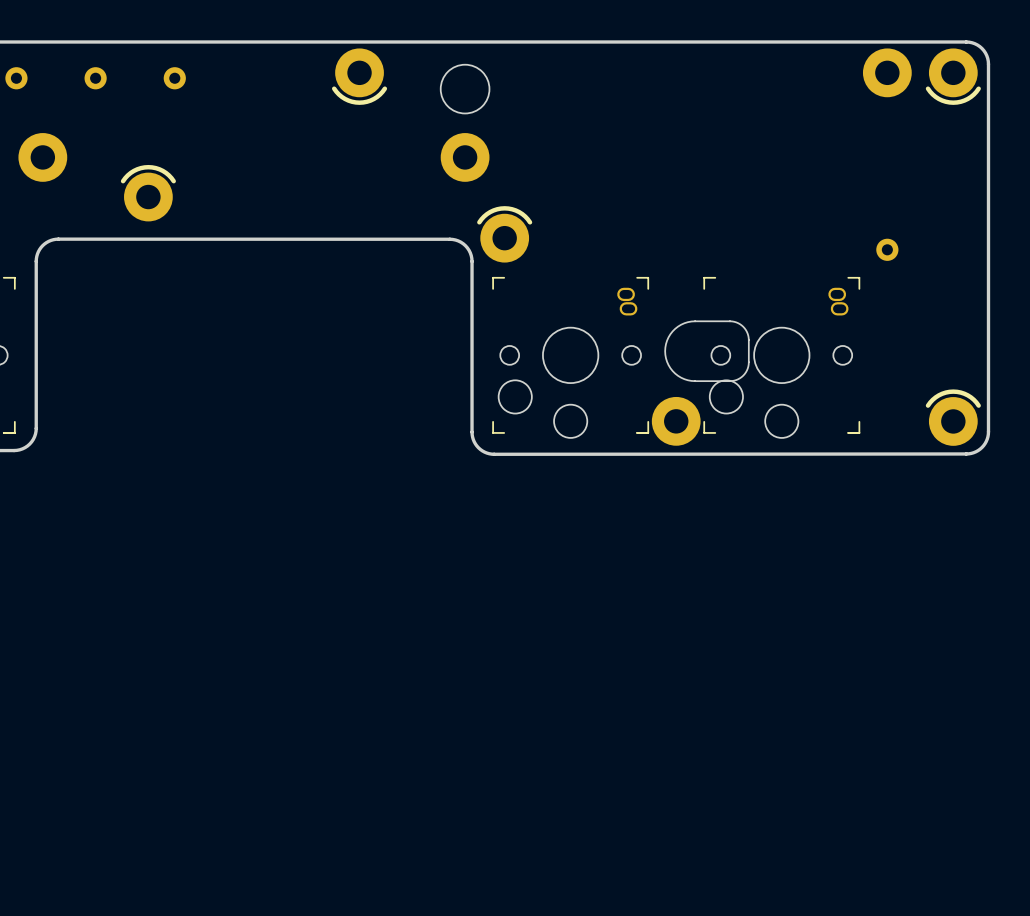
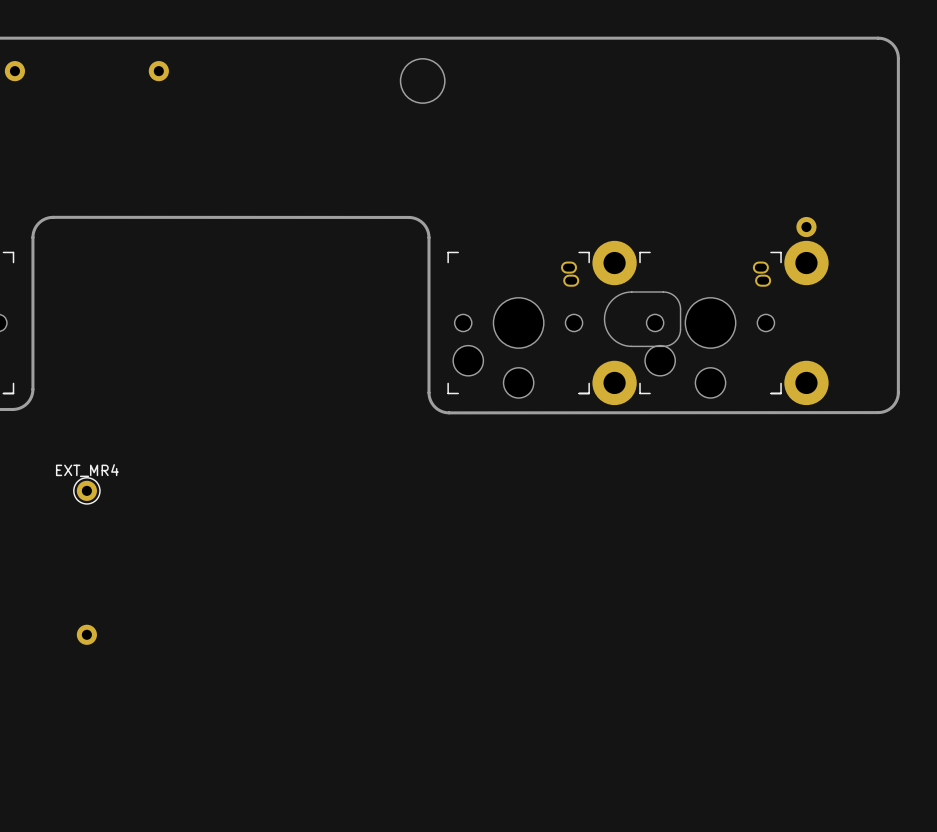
part: (887, 72) -> none
part: (359, 76) -> none
part: (953, 76) -> none
part: (95, 78) -> none
part: (42, 157) -> none
part: (465, 157) -> none
part: (148, 193) -> none
part: (504, 234) -> none
part: none -> (614, 263)
part: none -> (806, 263)
part: (953, 417) -> none
part: none -> (806, 382)
EXT_MR4: none -> (86, 490)
part: none -> (86, 634)

